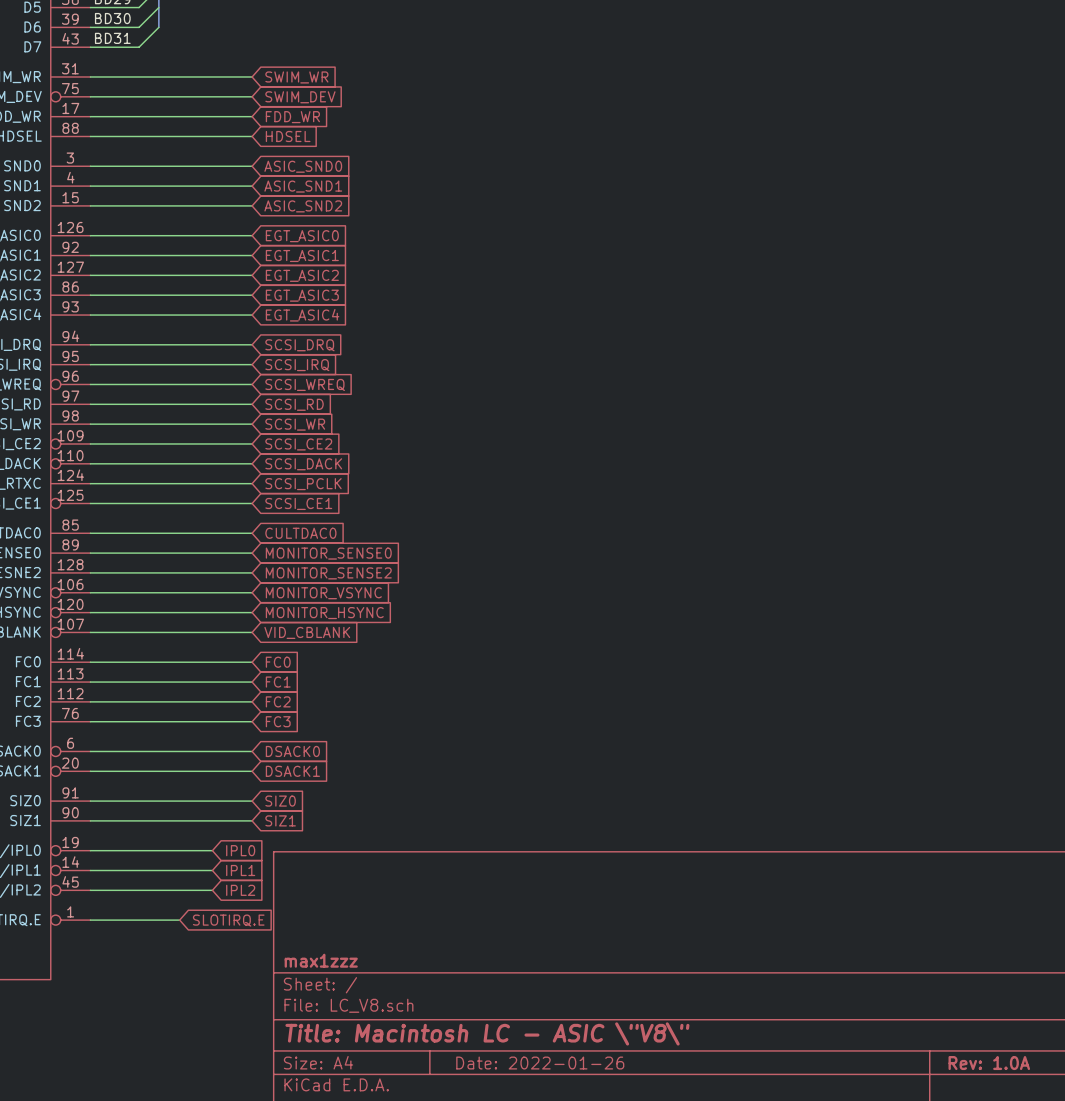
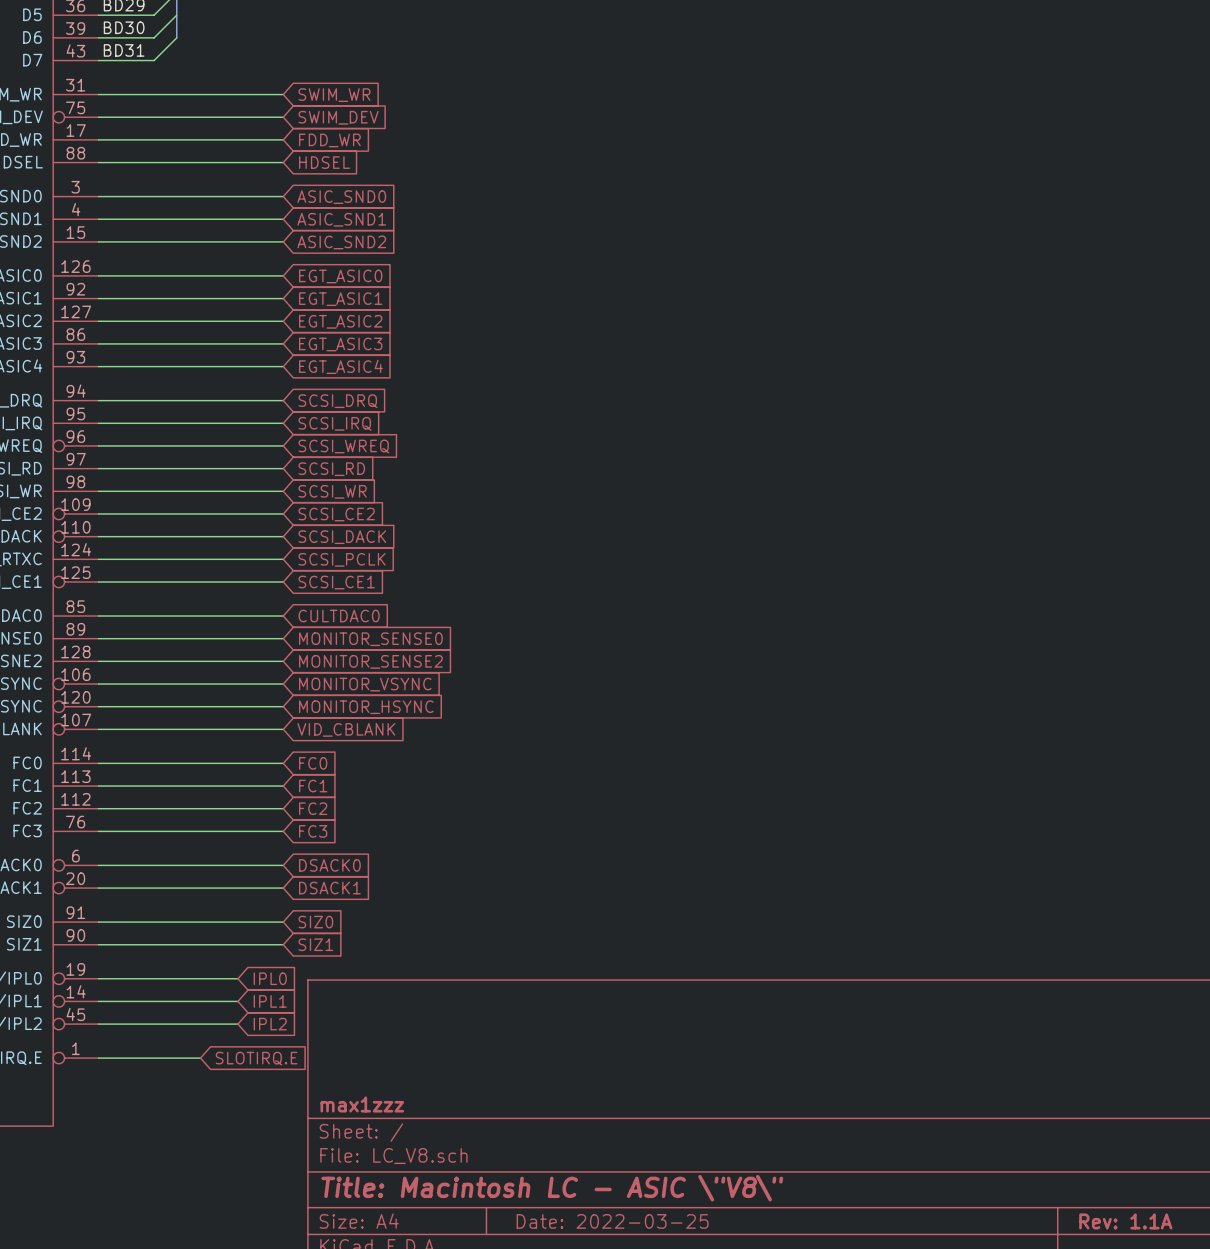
title block: Date: 2022-01-26 (540, 1063) -> Date: 2022-03-25 (612, 1221)
title block: Rev: 1.0A (989, 1063) -> Rev: 1.1A (1125, 1221)

